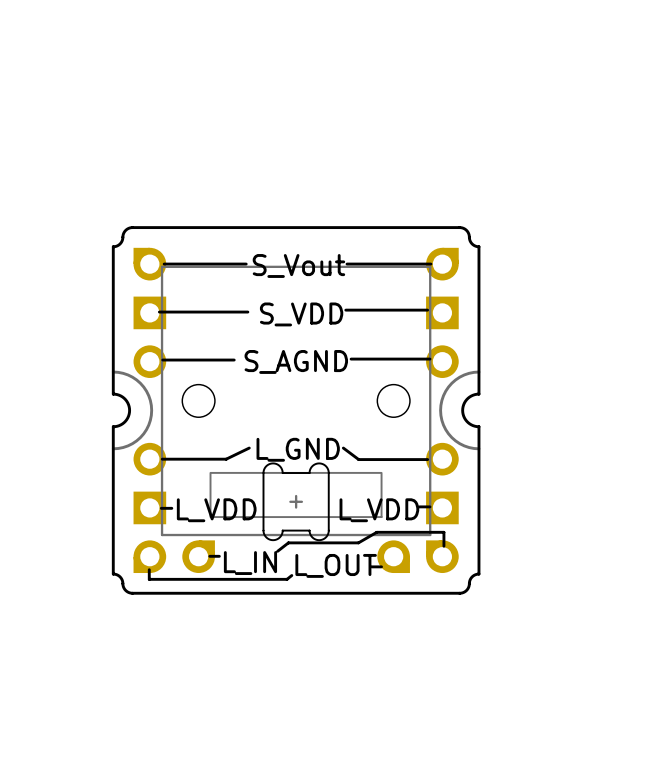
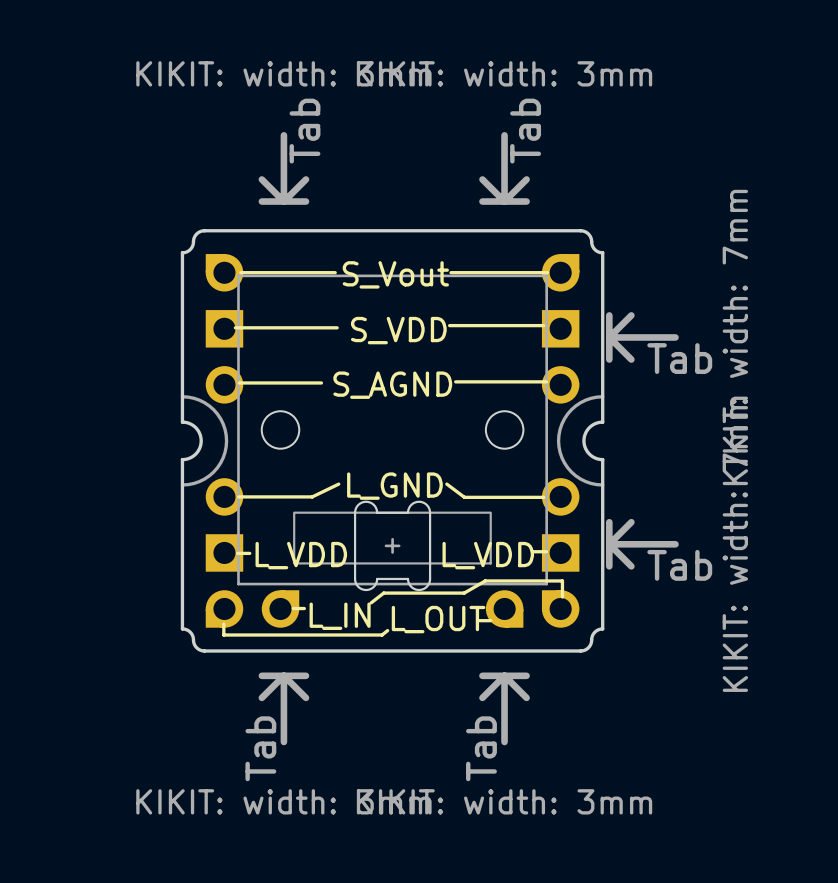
drawing: none -> [258, 132, 679, 746]

